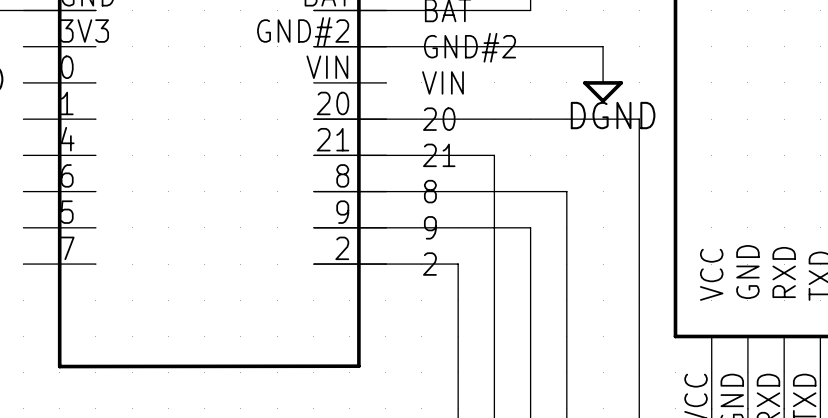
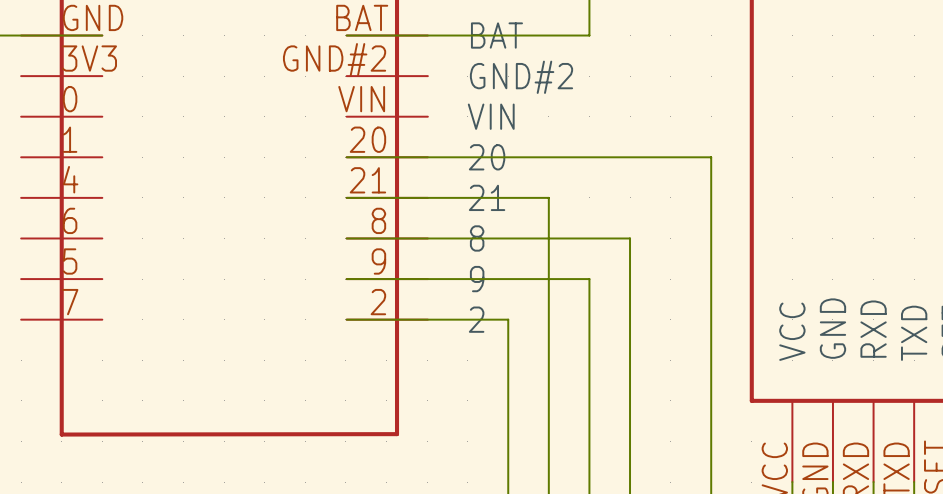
wire: (313, 46) (603, 46) -> none
power symbol: DGND (603, 74) -> none

